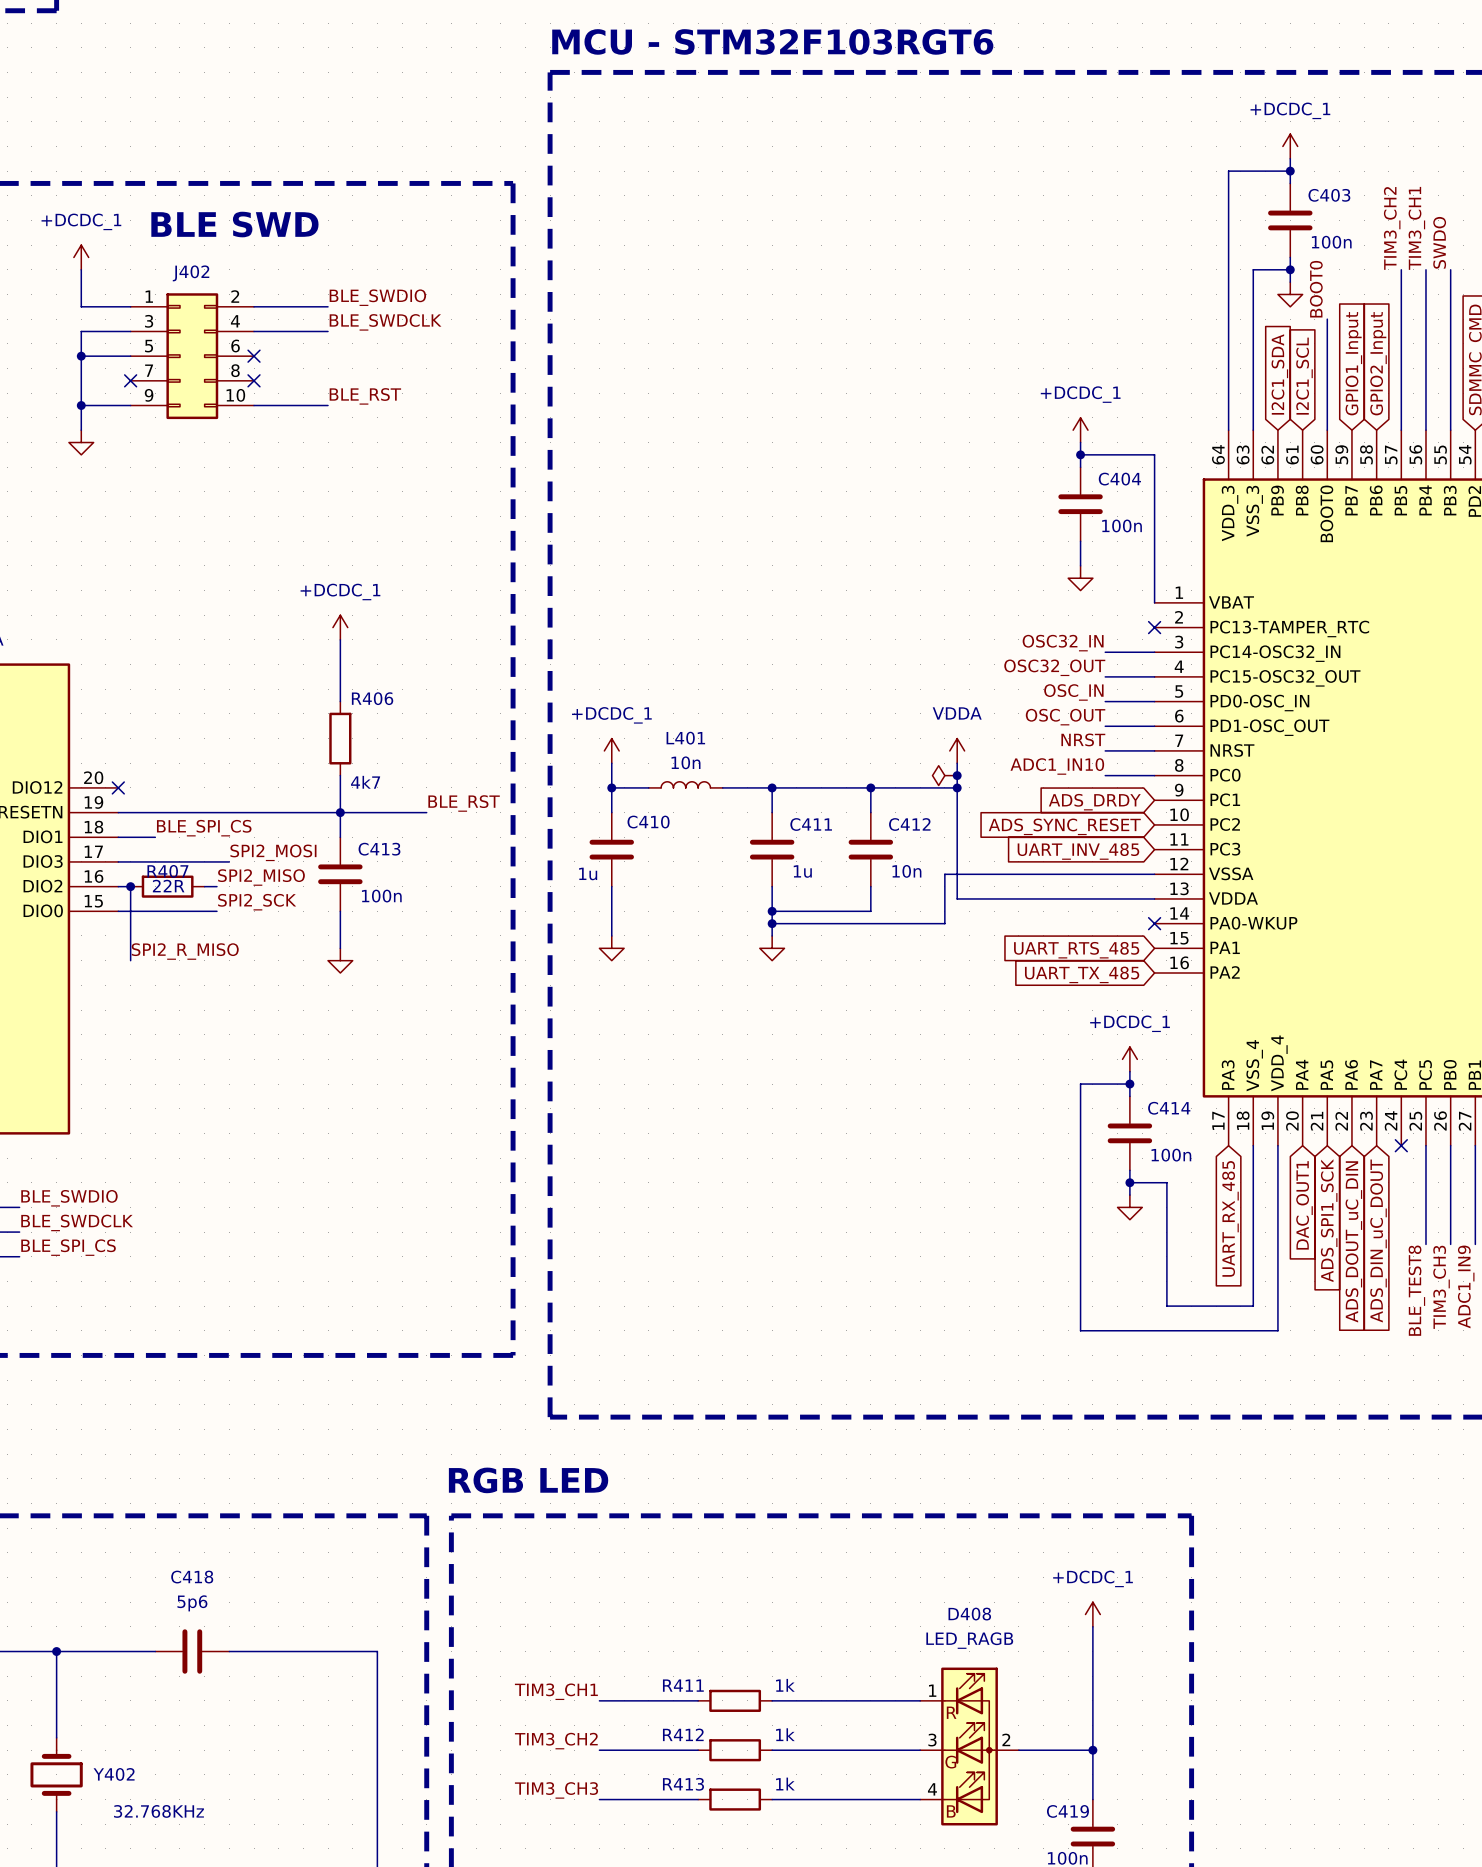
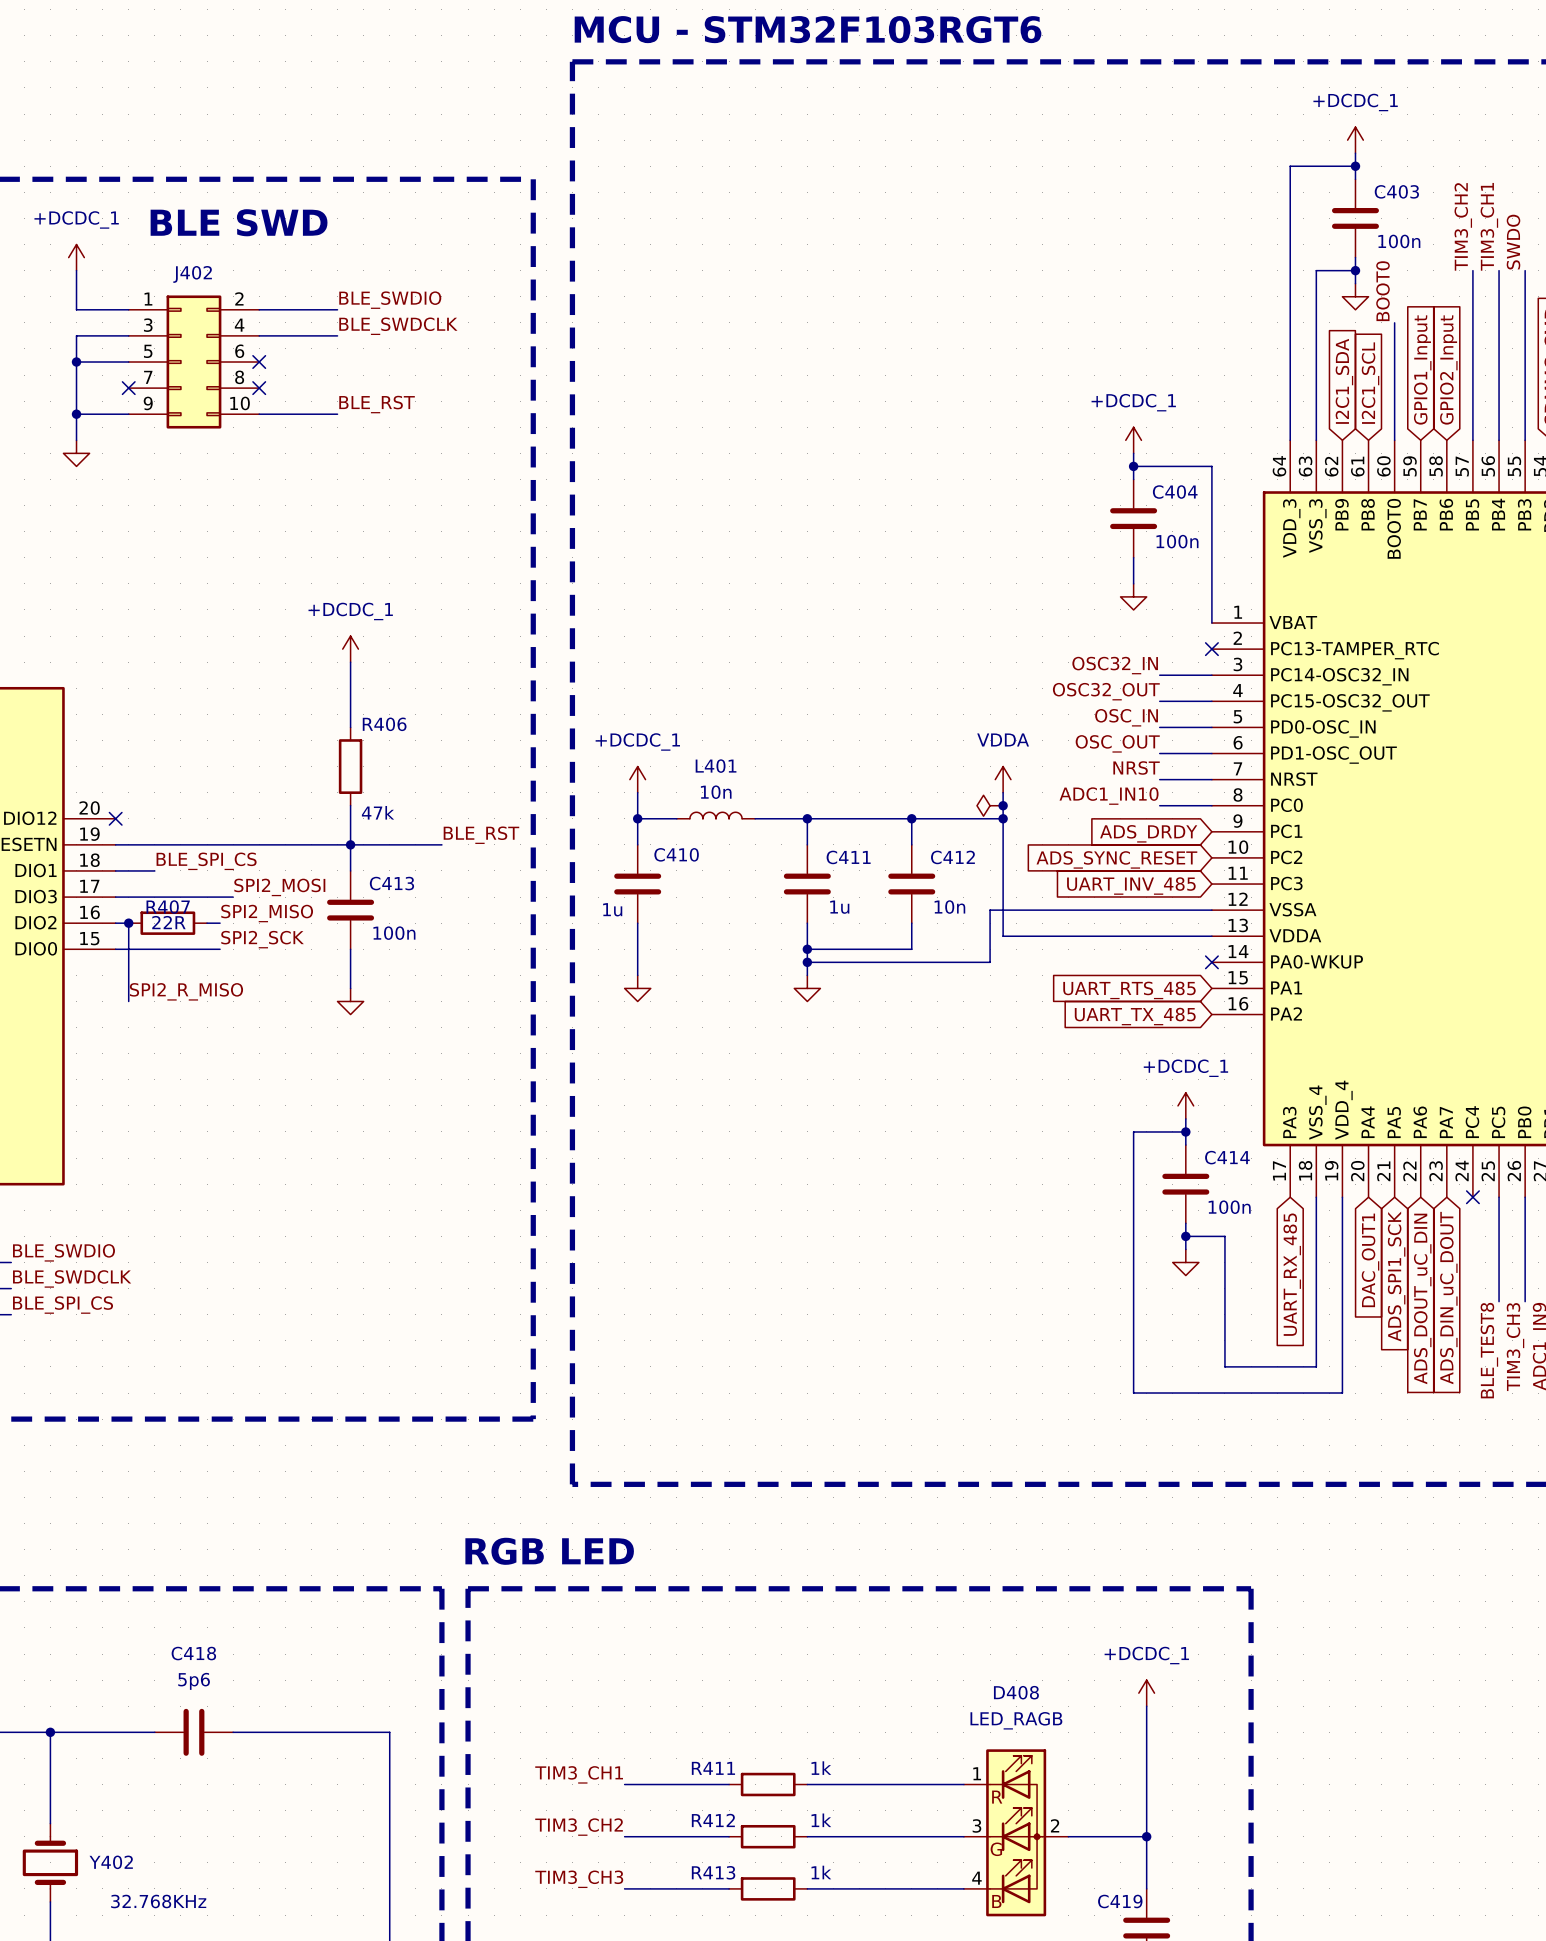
R406 value: 4k7 (365, 782) -> 47k (378, 812)

